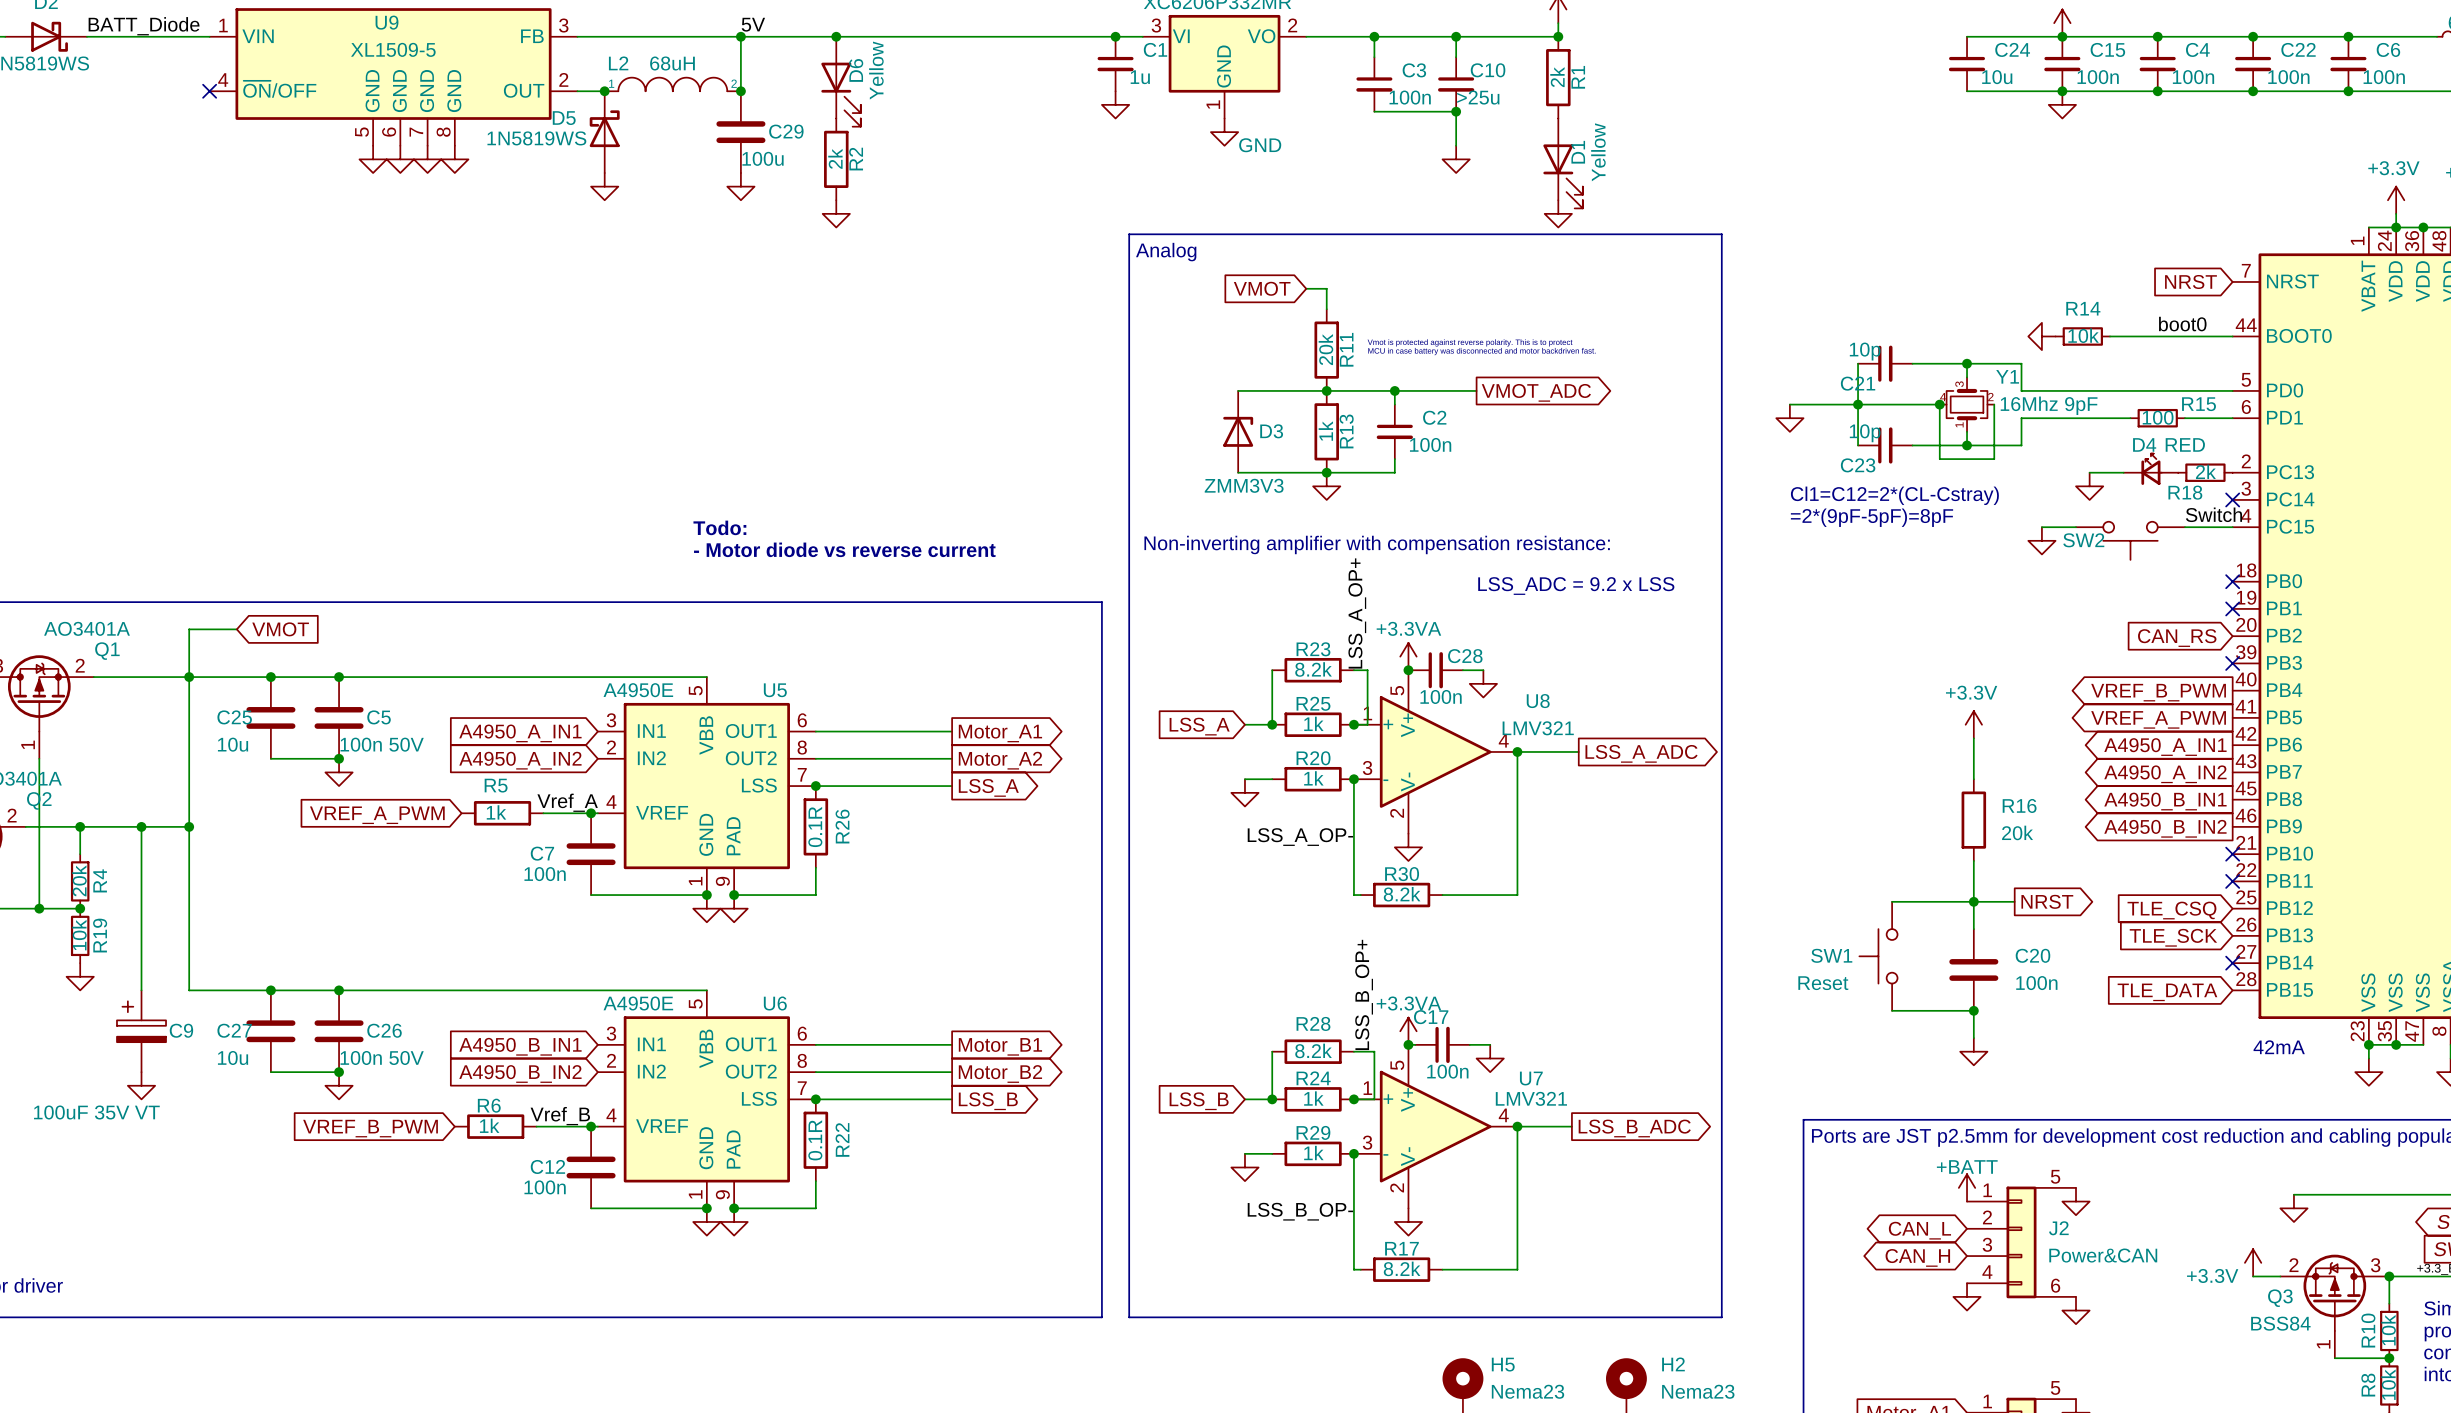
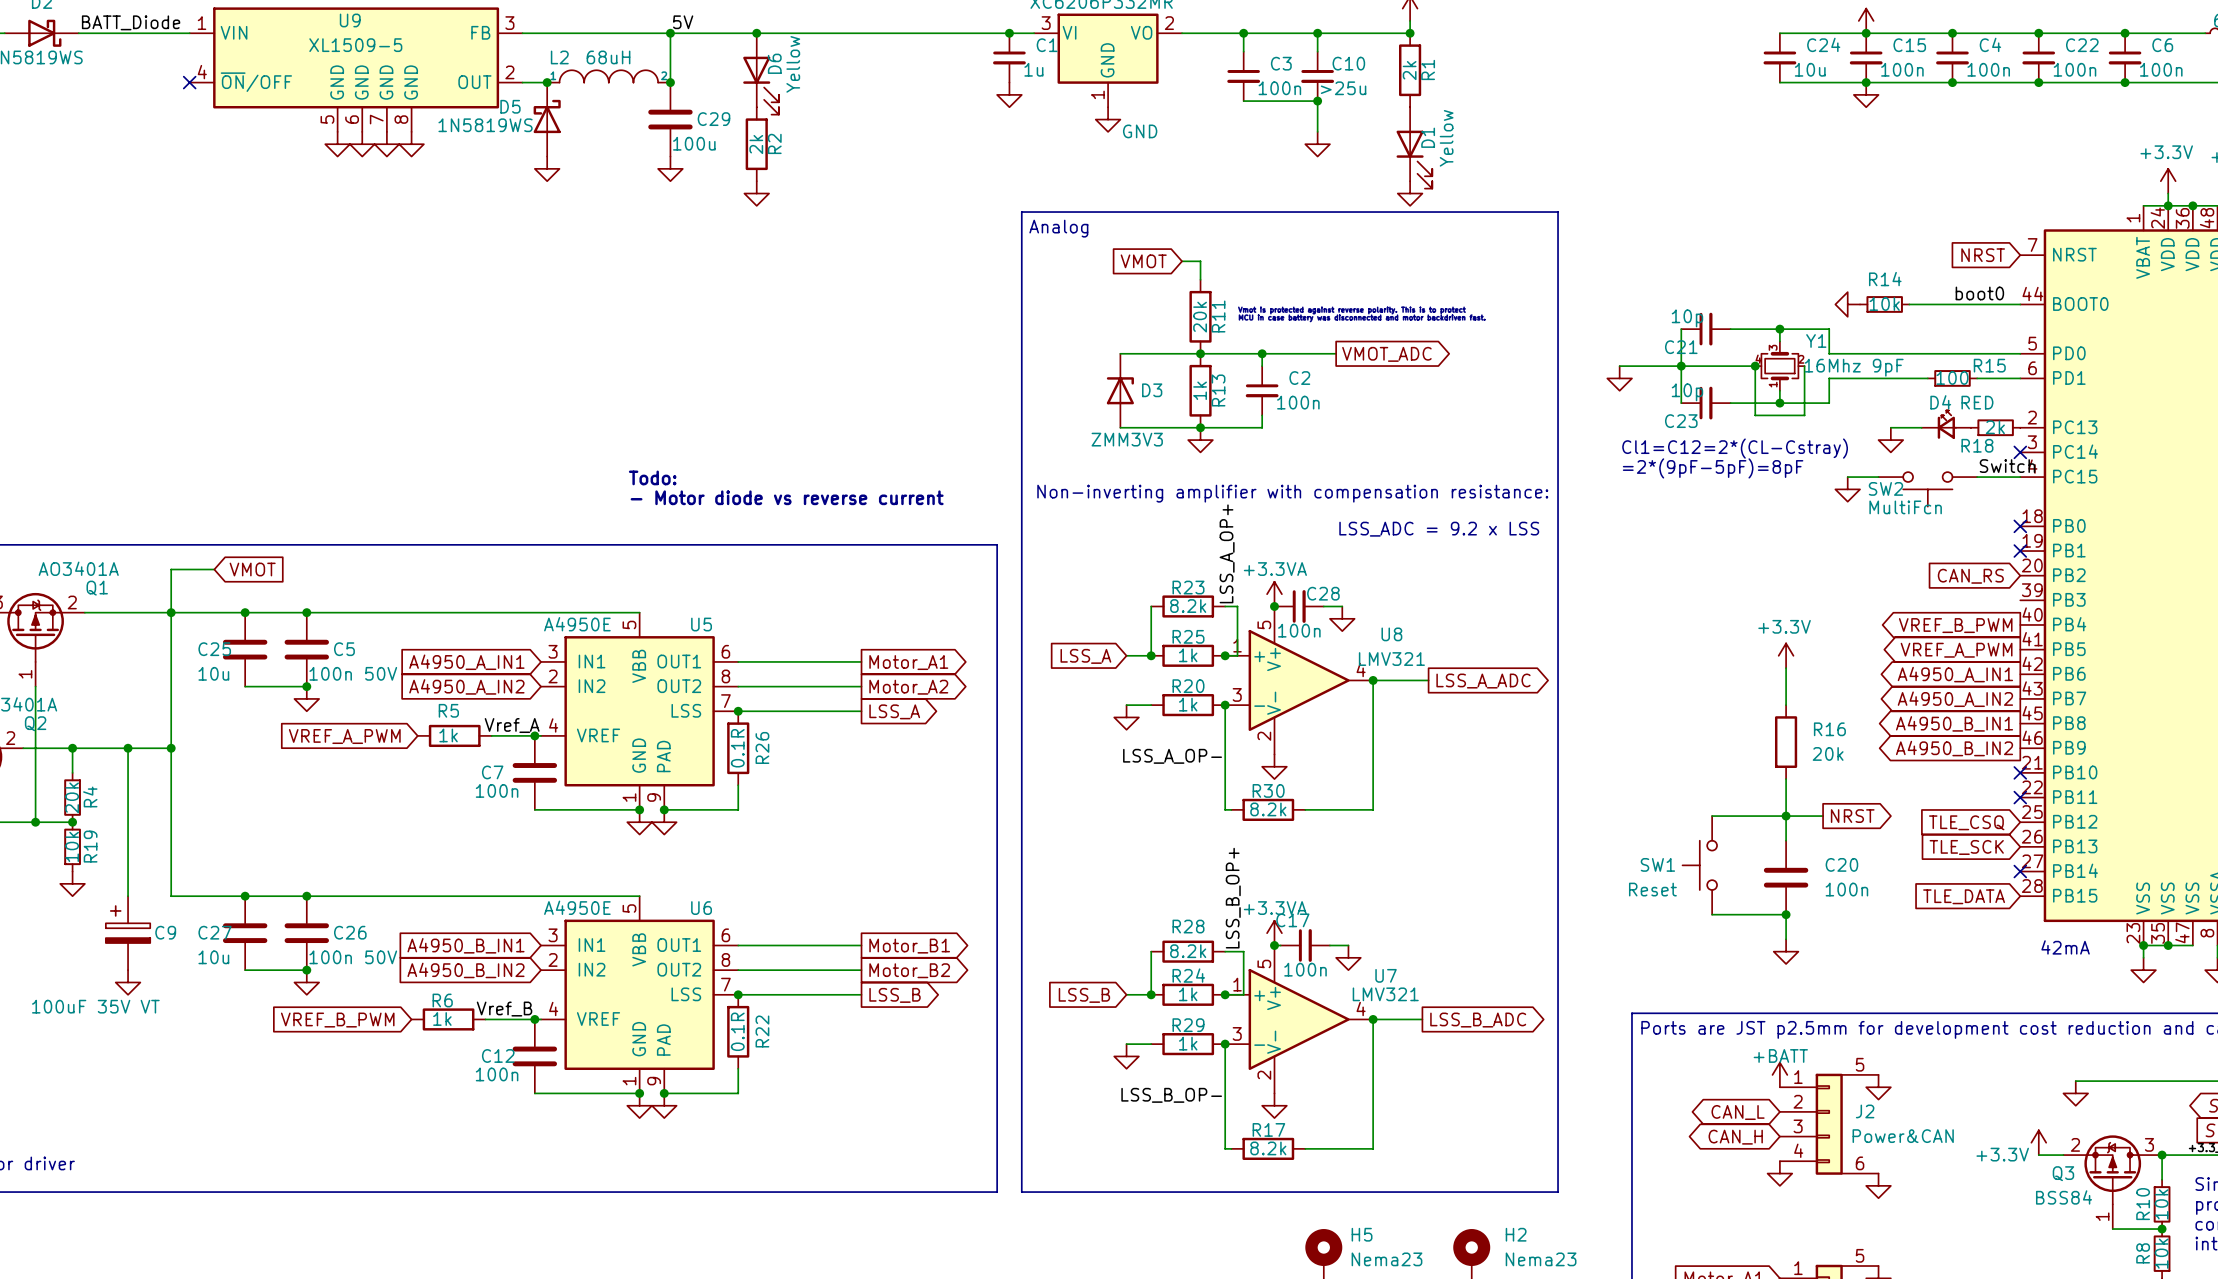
SW2 value: none -> MultiFcn (1905, 507)
no-connect mark: (2232, 663) -> none

